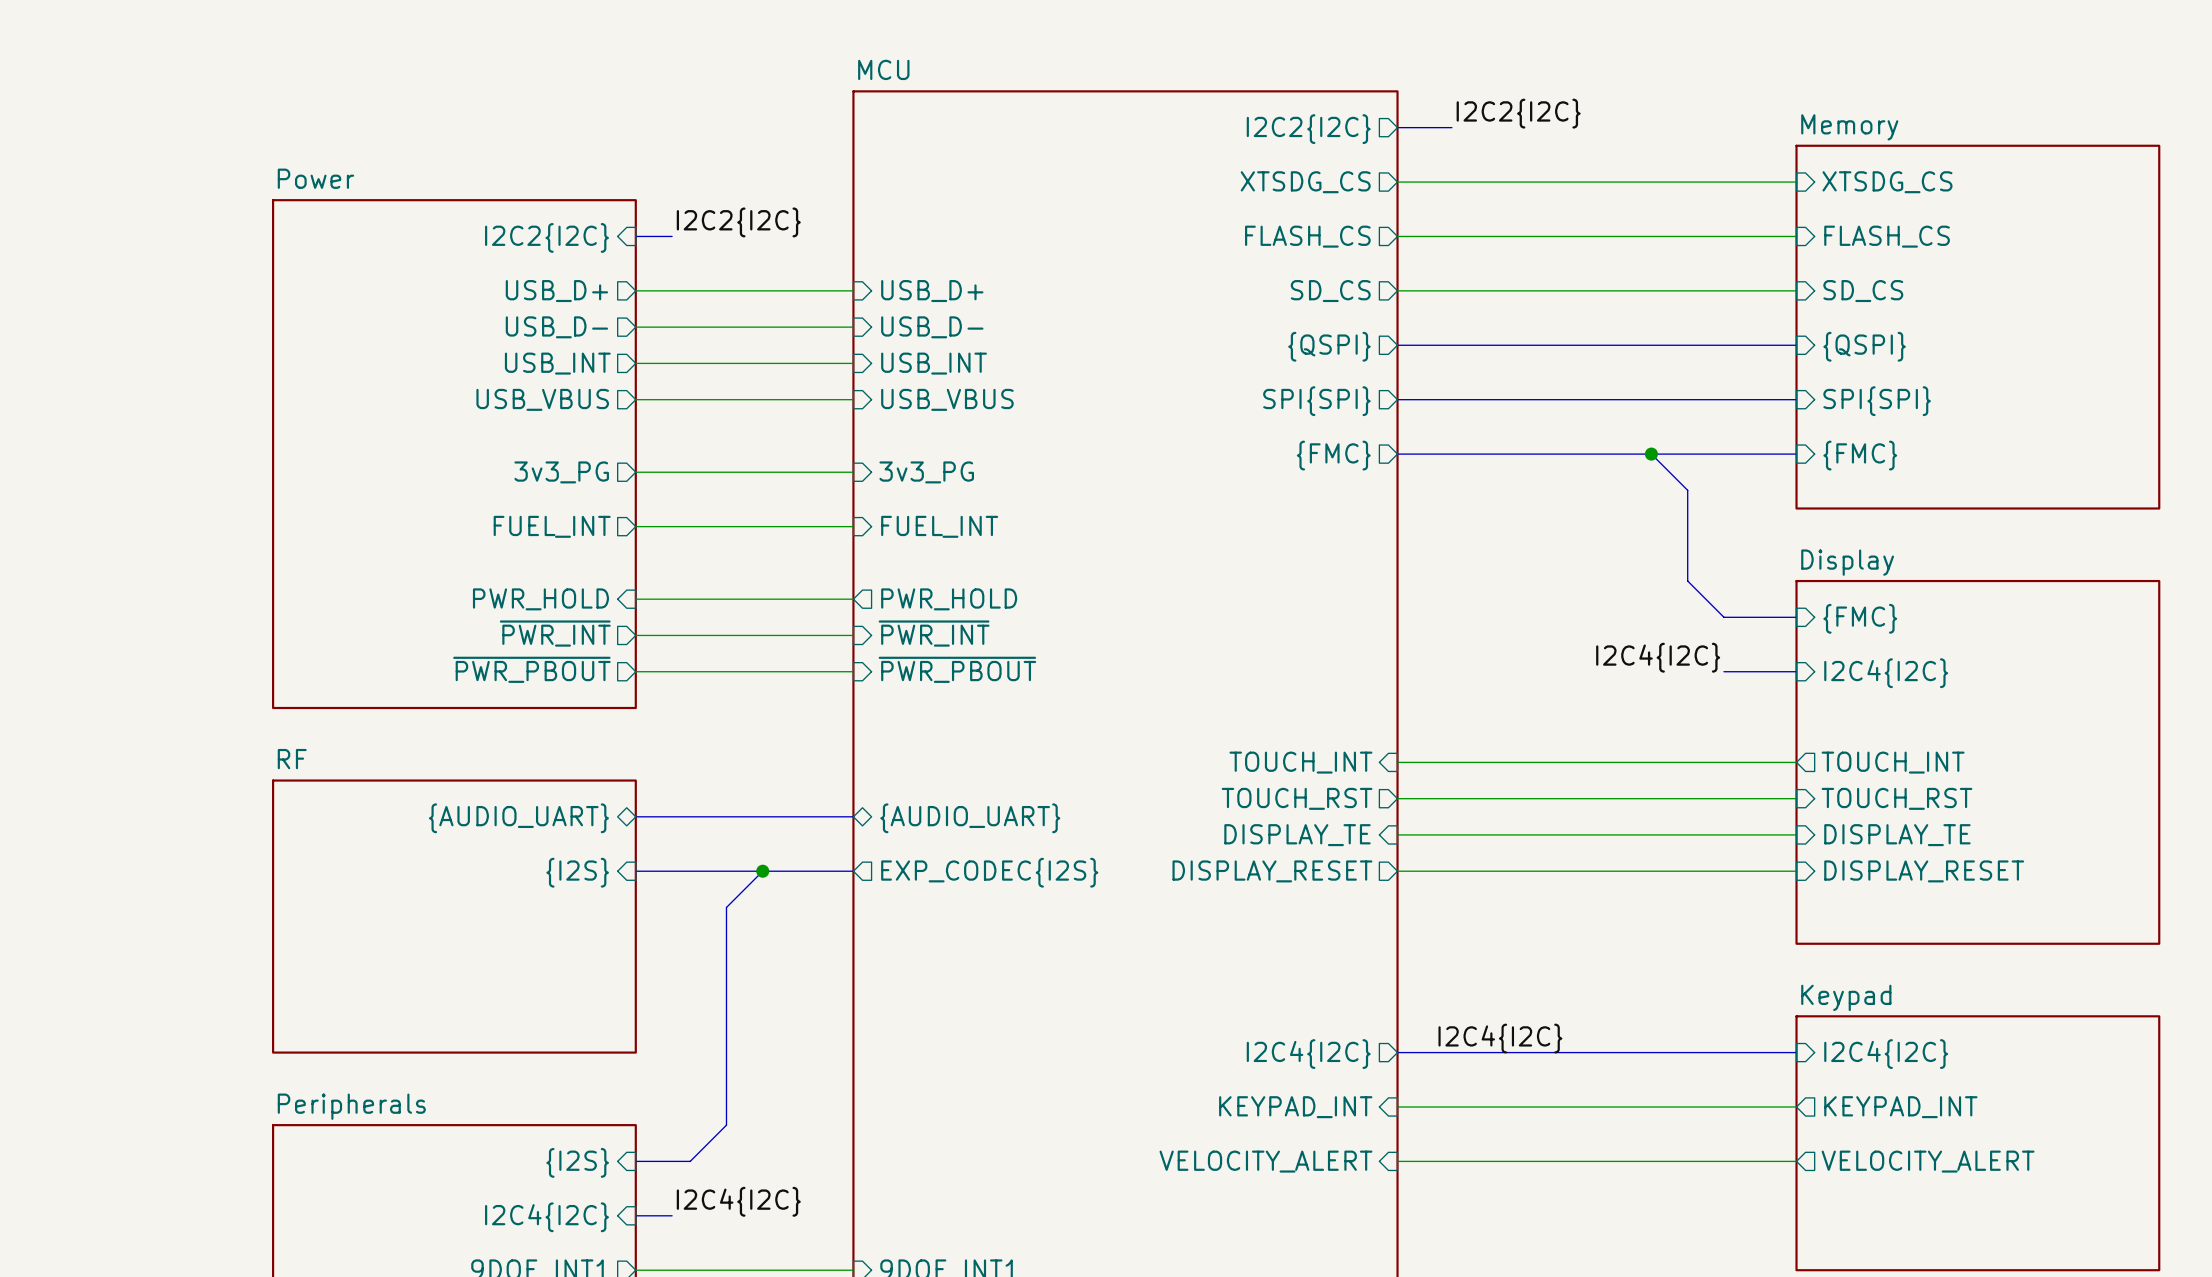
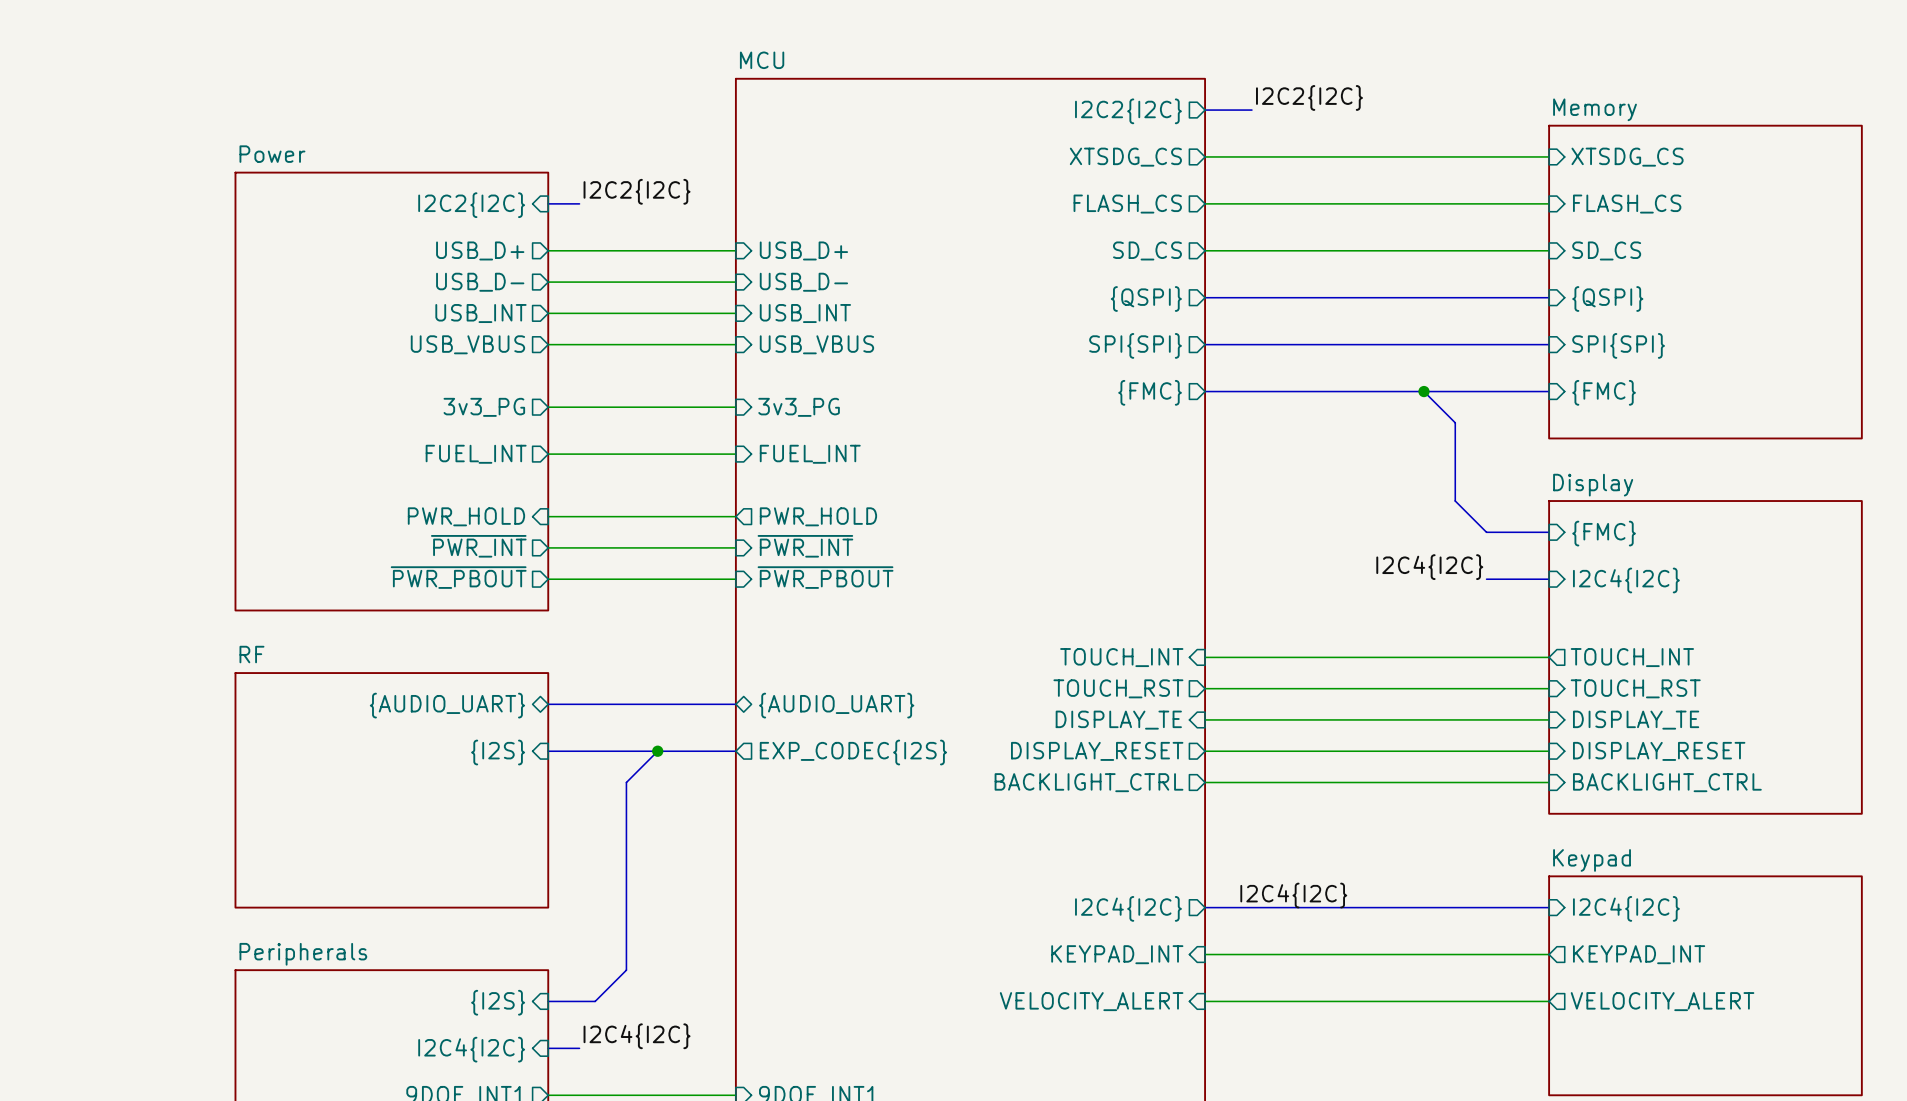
sheet pin: none -> BACKLIGHT_CTRL (1089, 782)
wire: none -> (1205, 782) (1549, 782)
sheet pin: none -> BACKLIGHT_CTRL (1667, 782)

